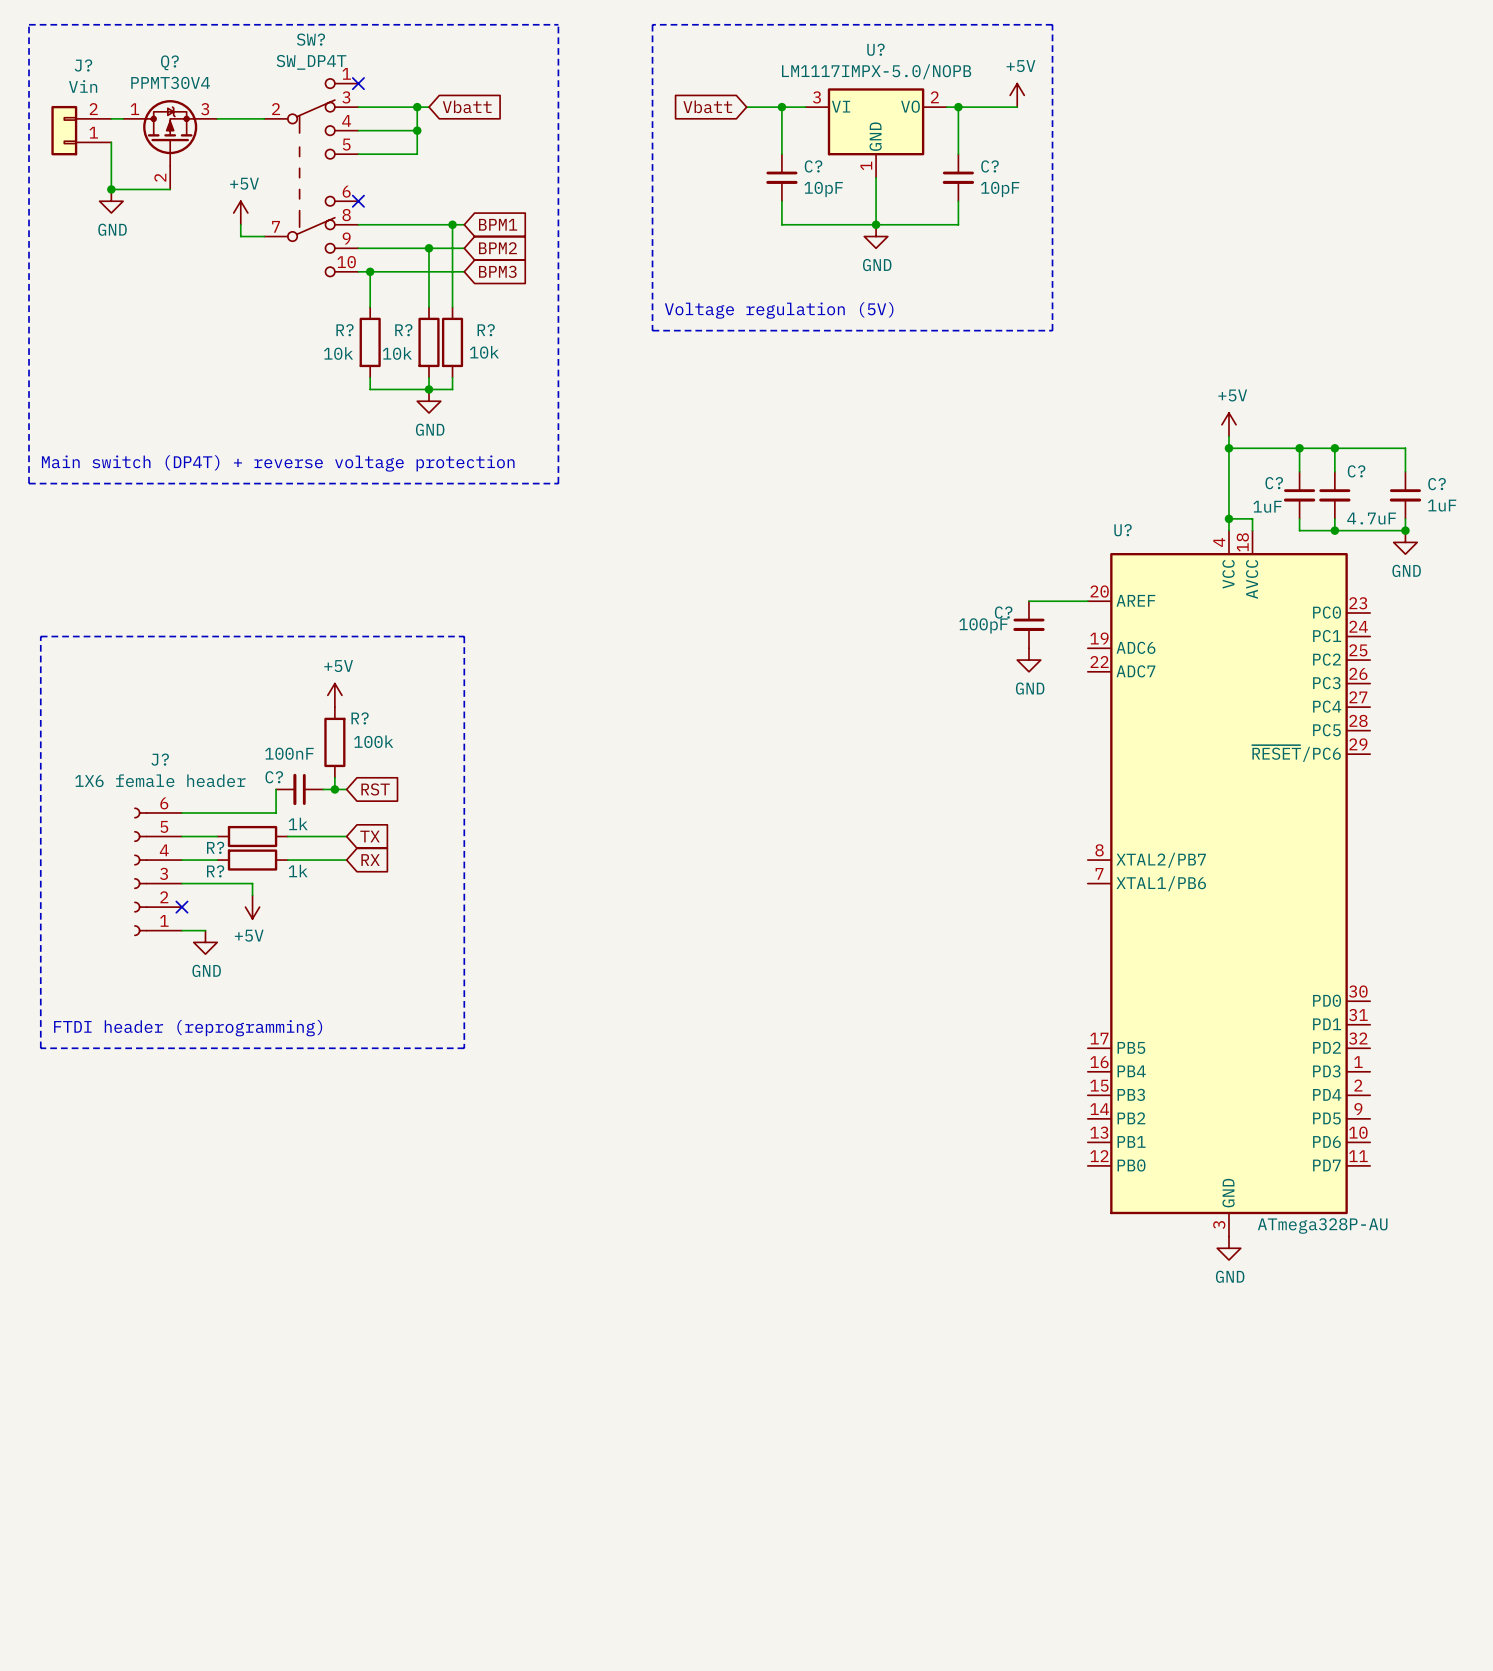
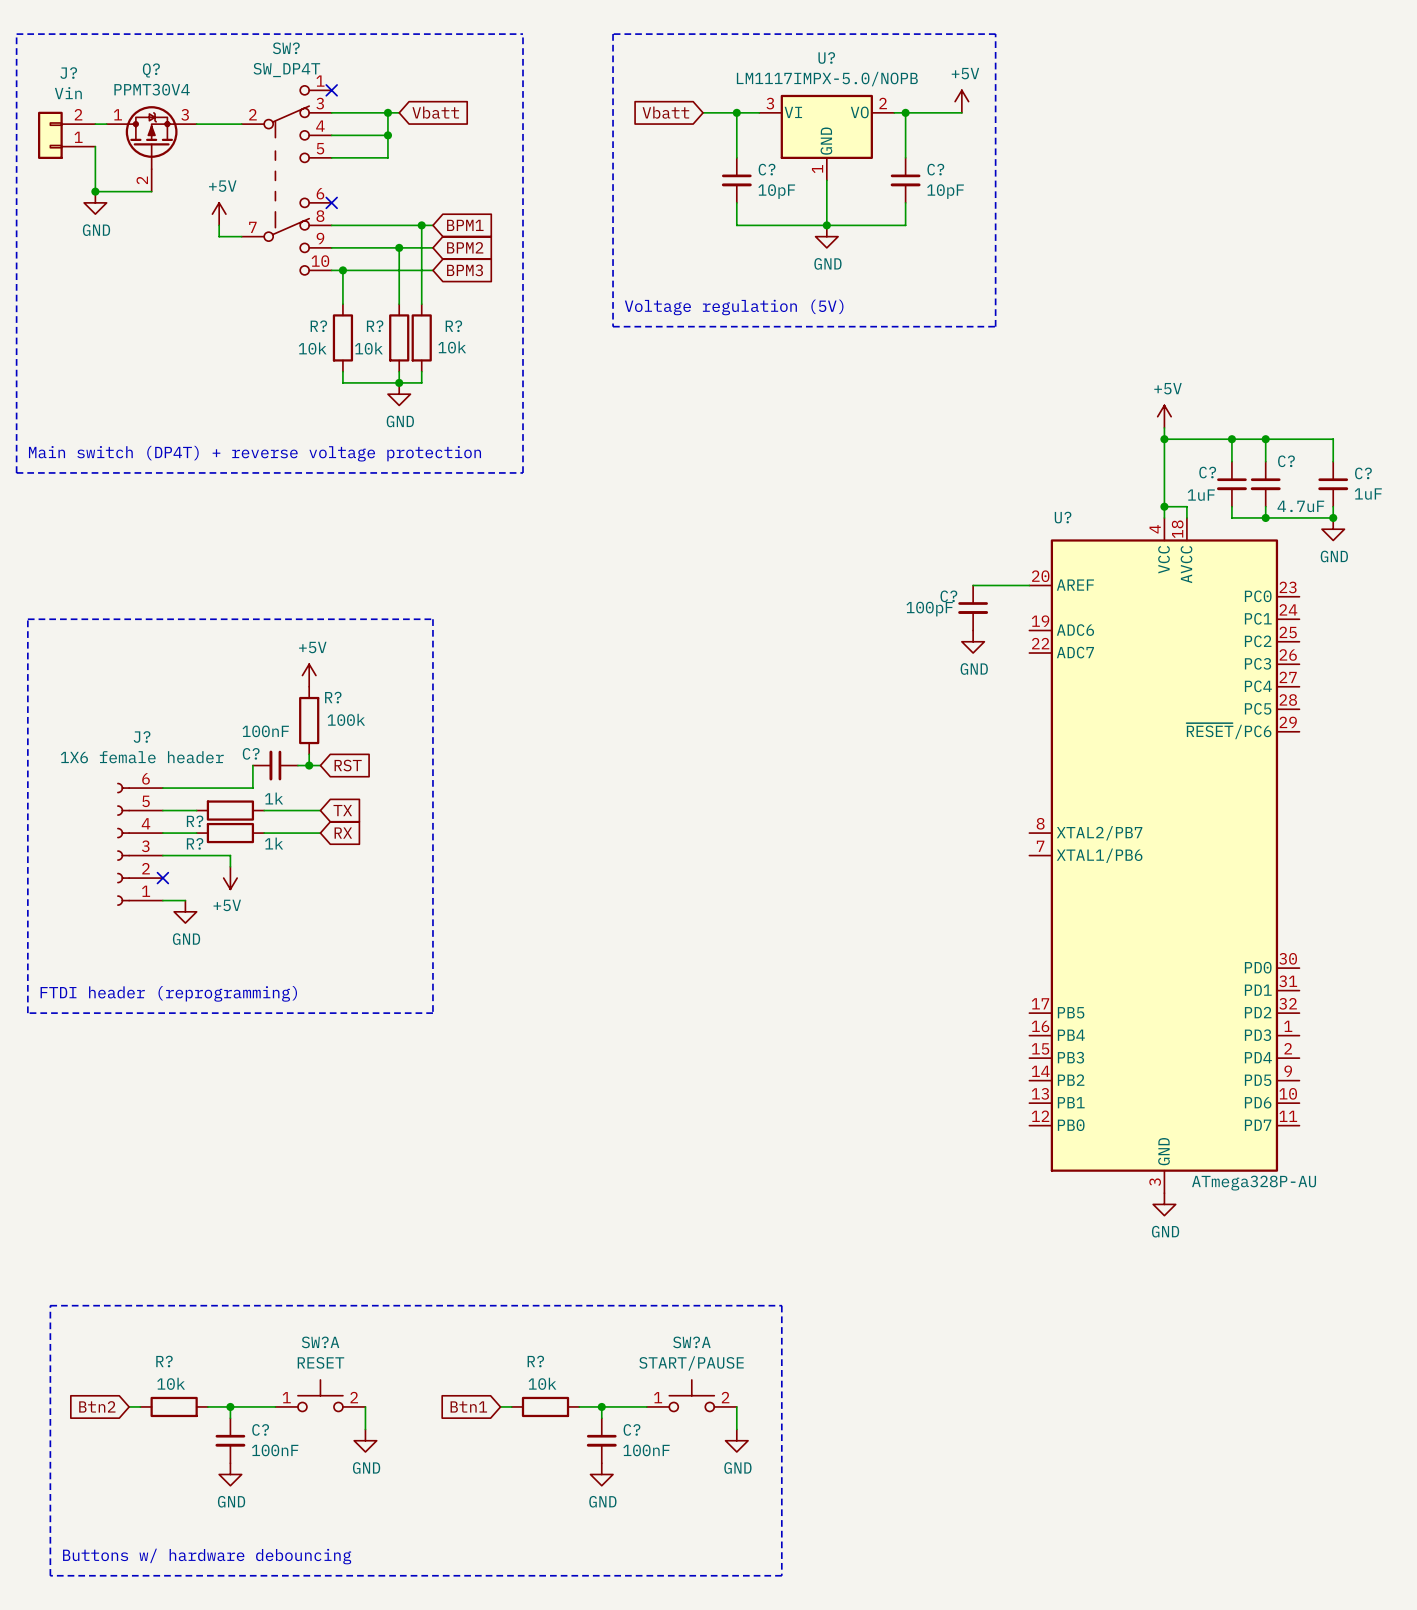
line: none -> (50, 1305) (50, 1575) (781, 1575) (781, 1305) (50, 1305)
SW?A: none -> RESET (320, 1395)
SW?A: none -> START/PAUSE (691, 1395)
global label: none -> Btn2 (97, 1406)
wire: none -> (129, 1406) (140, 1406)
R?: none -> 10k (174, 1406)
wire: none -> (207, 1406) (275, 1406)
wire: none -> (230, 1406) (230, 1418)
junction: none -> (230, 1406)
wire: none -> (365, 1406) (365, 1429)
global label: none -> Btn1 (468, 1406)
wire: none -> (500, 1406) (511, 1406)
R?: none -> 10k (545, 1406)
wire: none -> (579, 1406) (646, 1406)
wire: none -> (601, 1406) (601, 1418)
junction: none -> (601, 1406)
wire: none -> (736, 1406) (736, 1429)
C?: none -> 100nF (230, 1440)
power symbol: none -> GND (365, 1440)
C?: none -> 100nF (601, 1440)
power symbol: none -> GND (736, 1440)
power symbol: none -> GND (230, 1474)
power symbol: none -> GND (601, 1474)
text: none -> Buttons w/ hardware debouncing (207, 1556)

